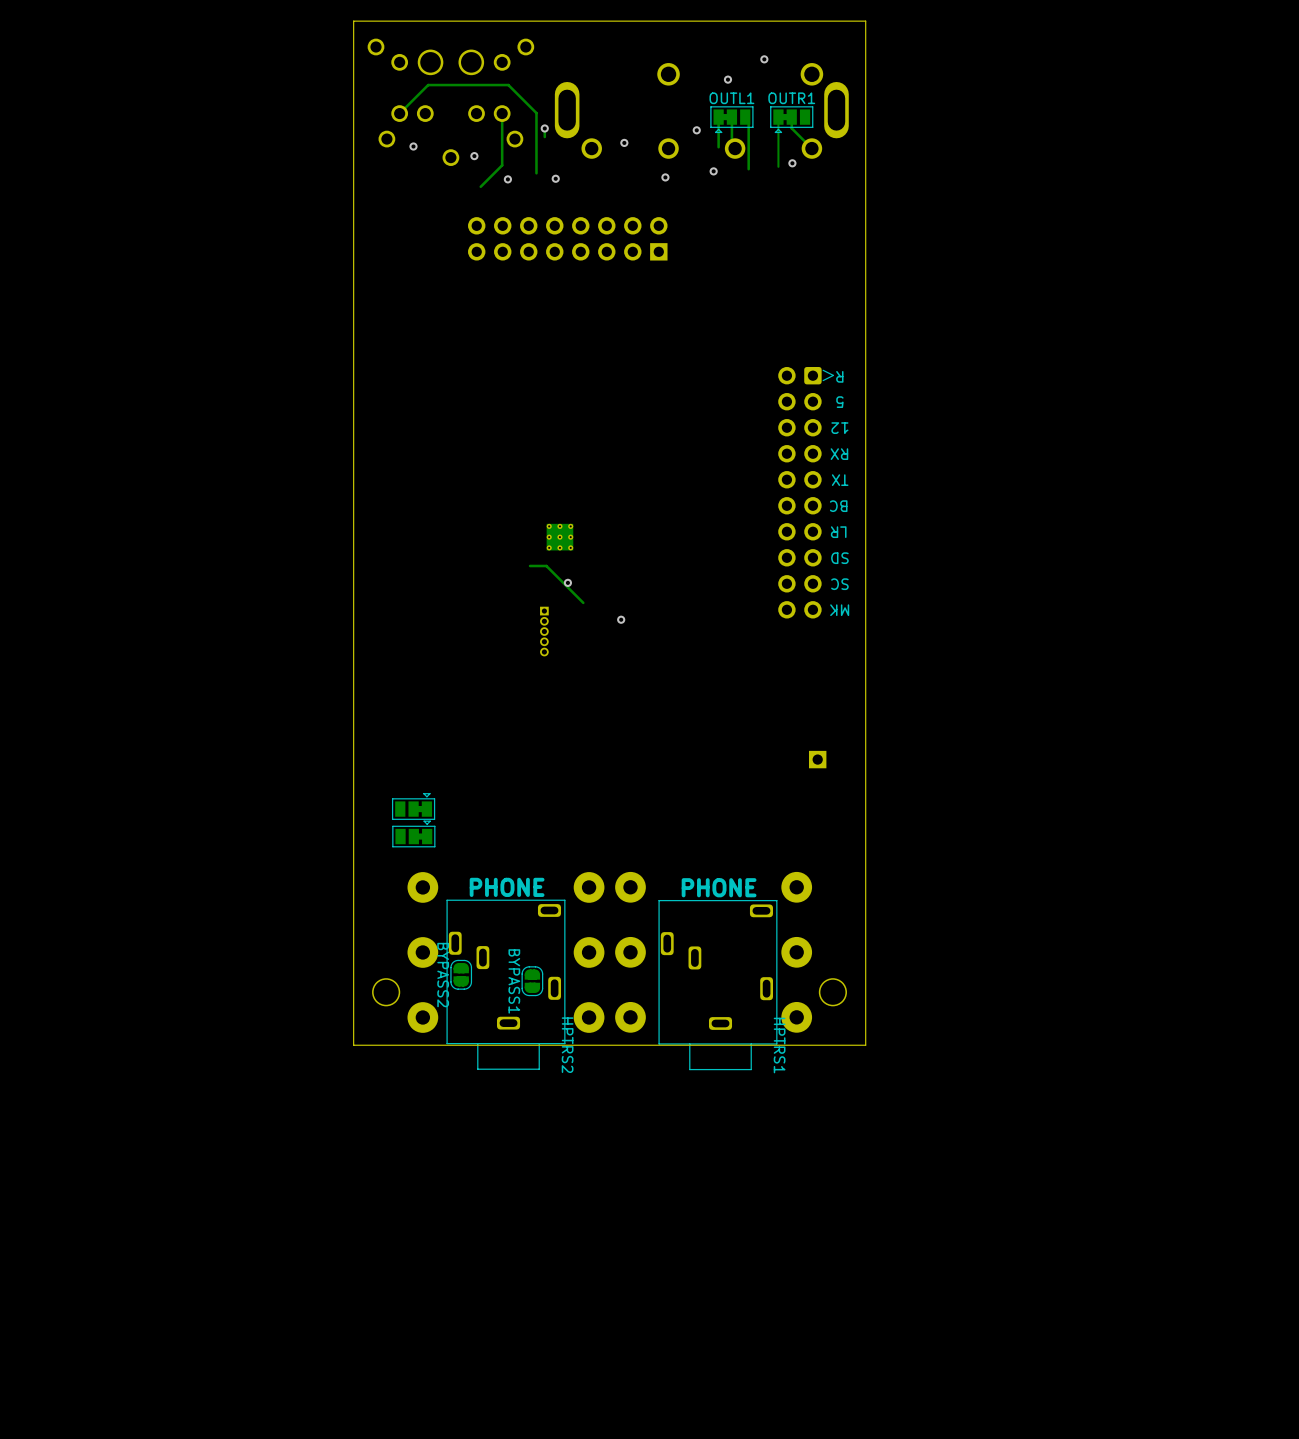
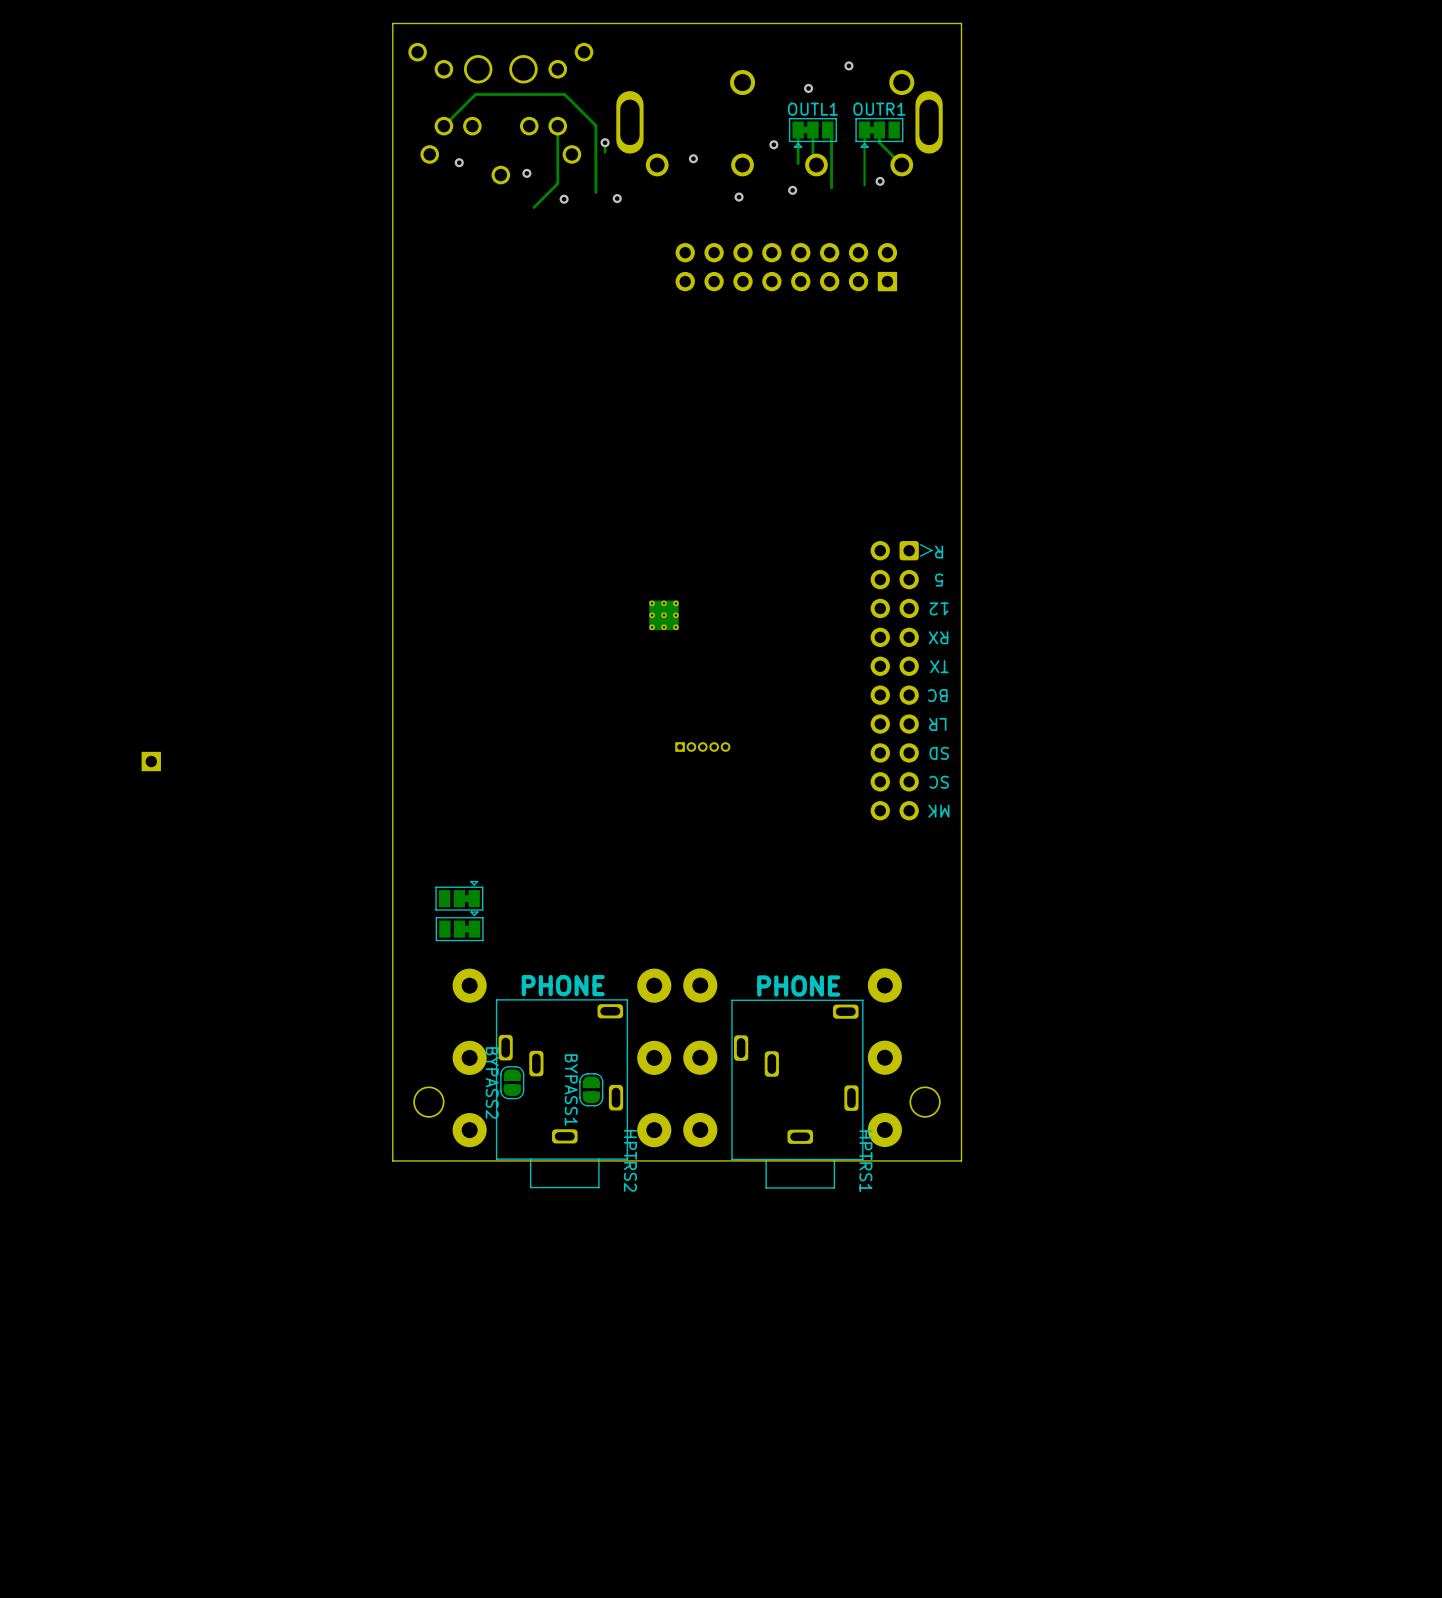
part position: (567, 238) -> (786, 267)
part position: (806, 492) -> (901, 680)
part position: (559, 537) -> (663, 615)
track: (530, 566) (546, 566) (583, 602) -> none
via: (567, 582) -> none
via: (621, 619) -> none
part rotation: 0° (544, 631) -> 90° counterclockwise (702, 747)
part position: (544, 631) -> (702, 747)
part: none -> (151, 761)
part: (817, 759) -> none

